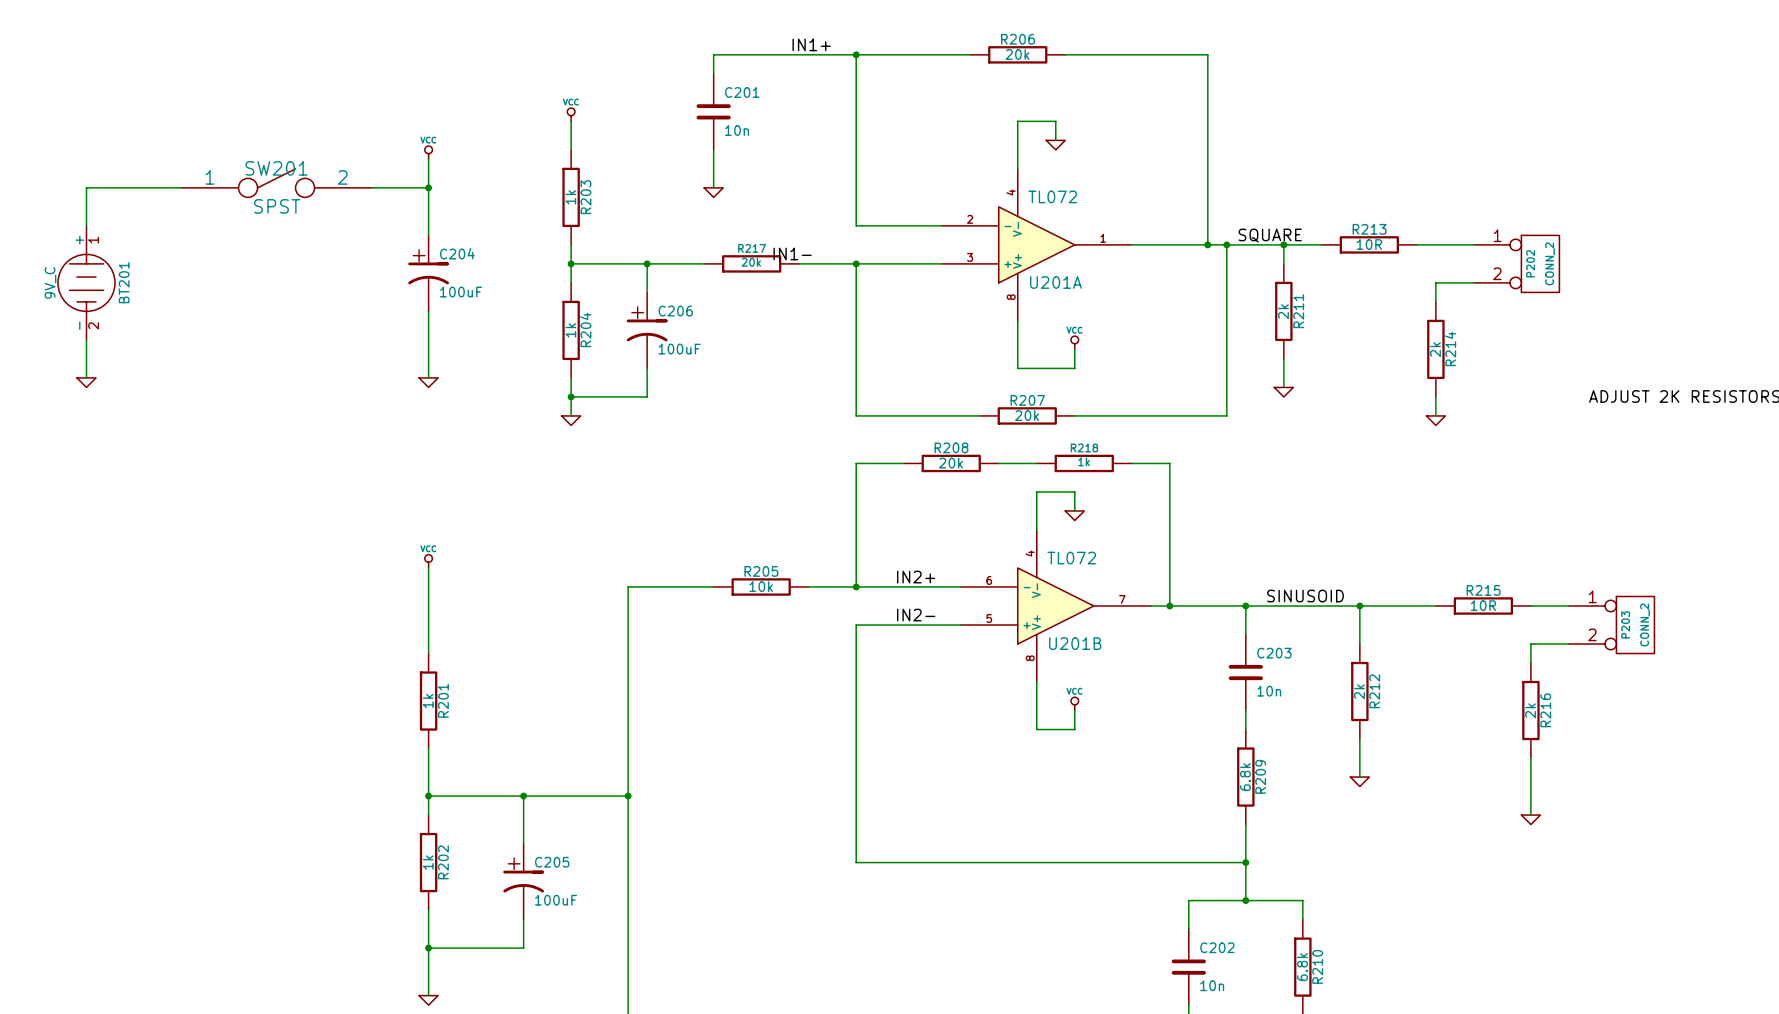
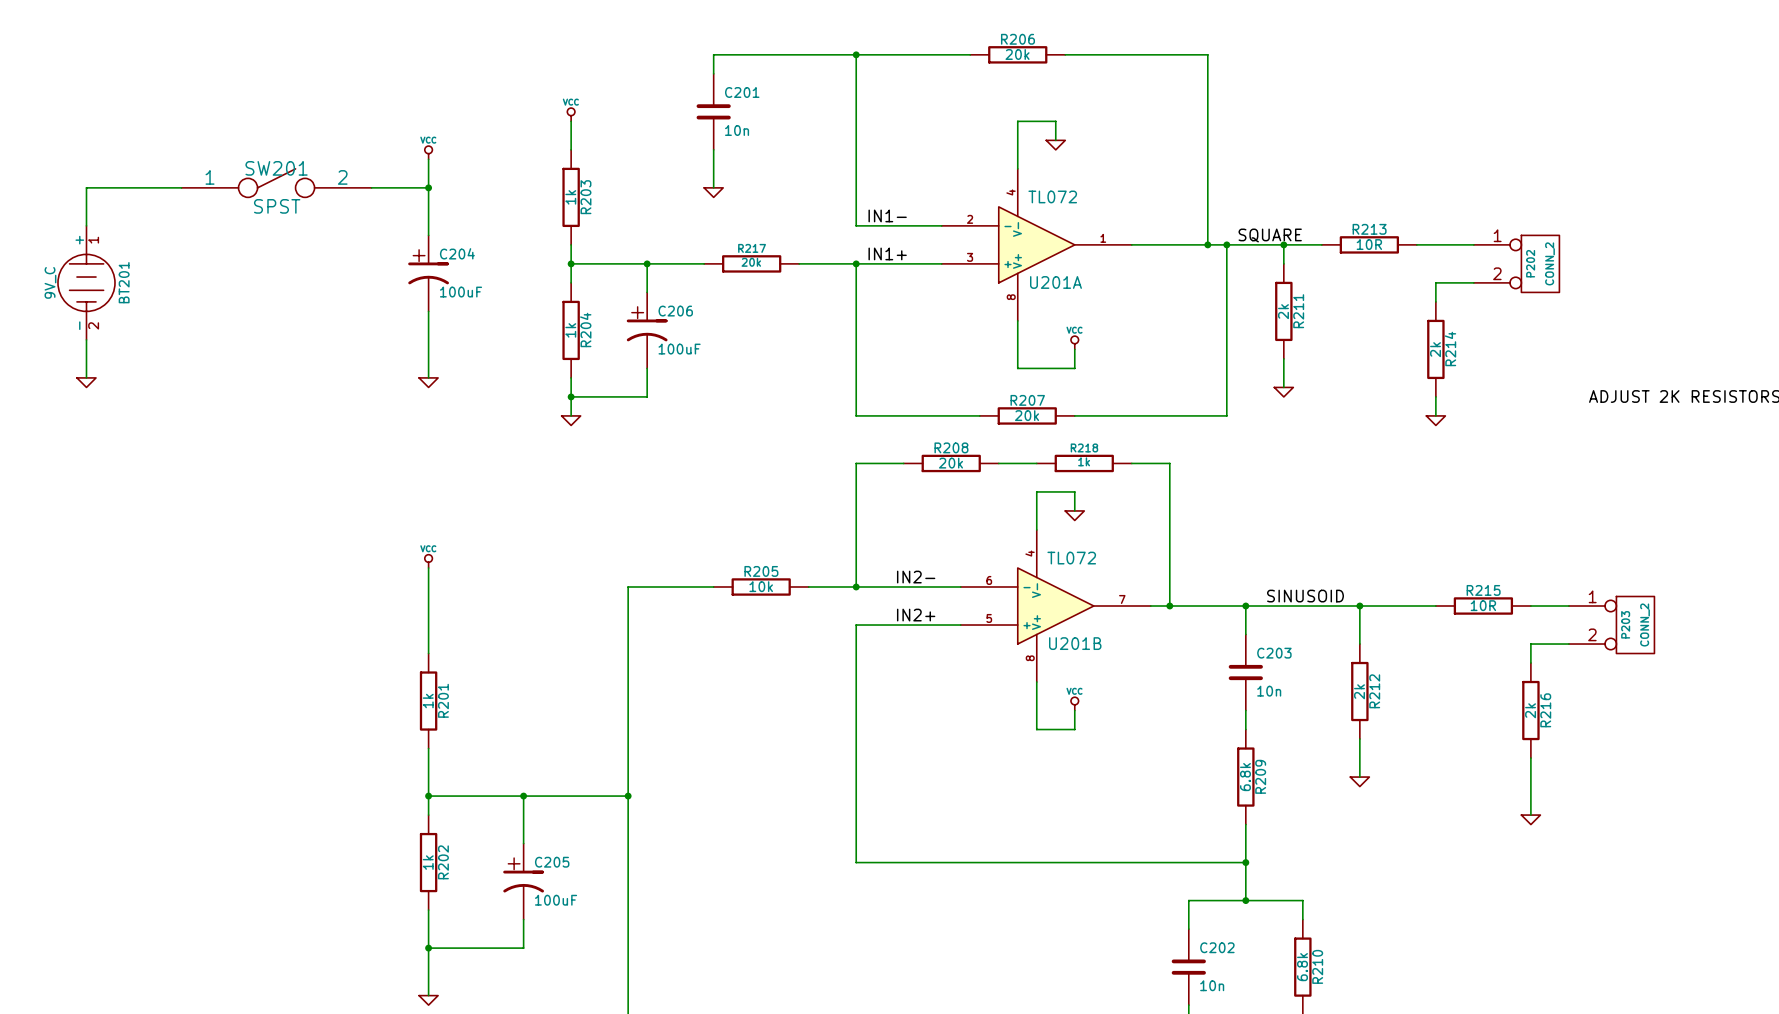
label: IN1+ (811, 44) -> none
label position: IN1- (792, 253) -> IN1- (887, 215)
label: none -> IN1+ (887, 253)
label: IN2+ (916, 577) -> IN2- (916, 577)
label: IN2- (916, 615) -> IN2+ (916, 615)

